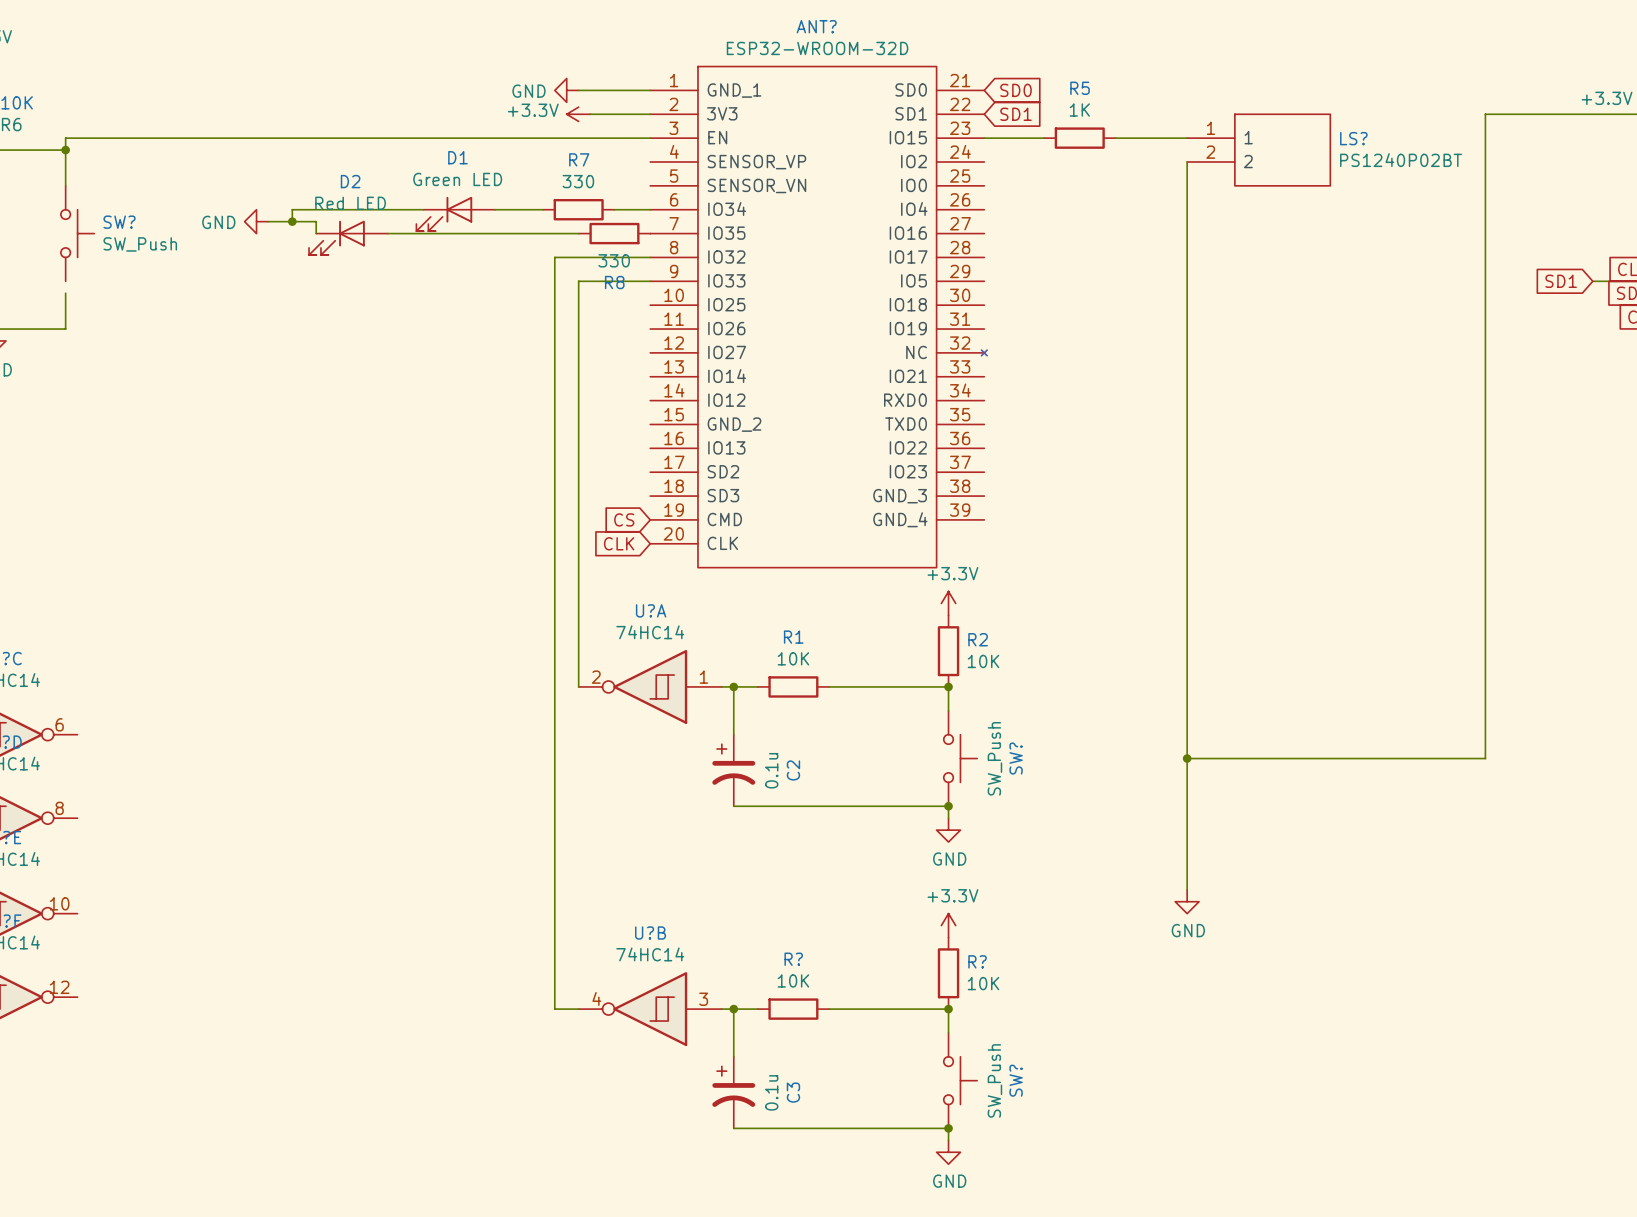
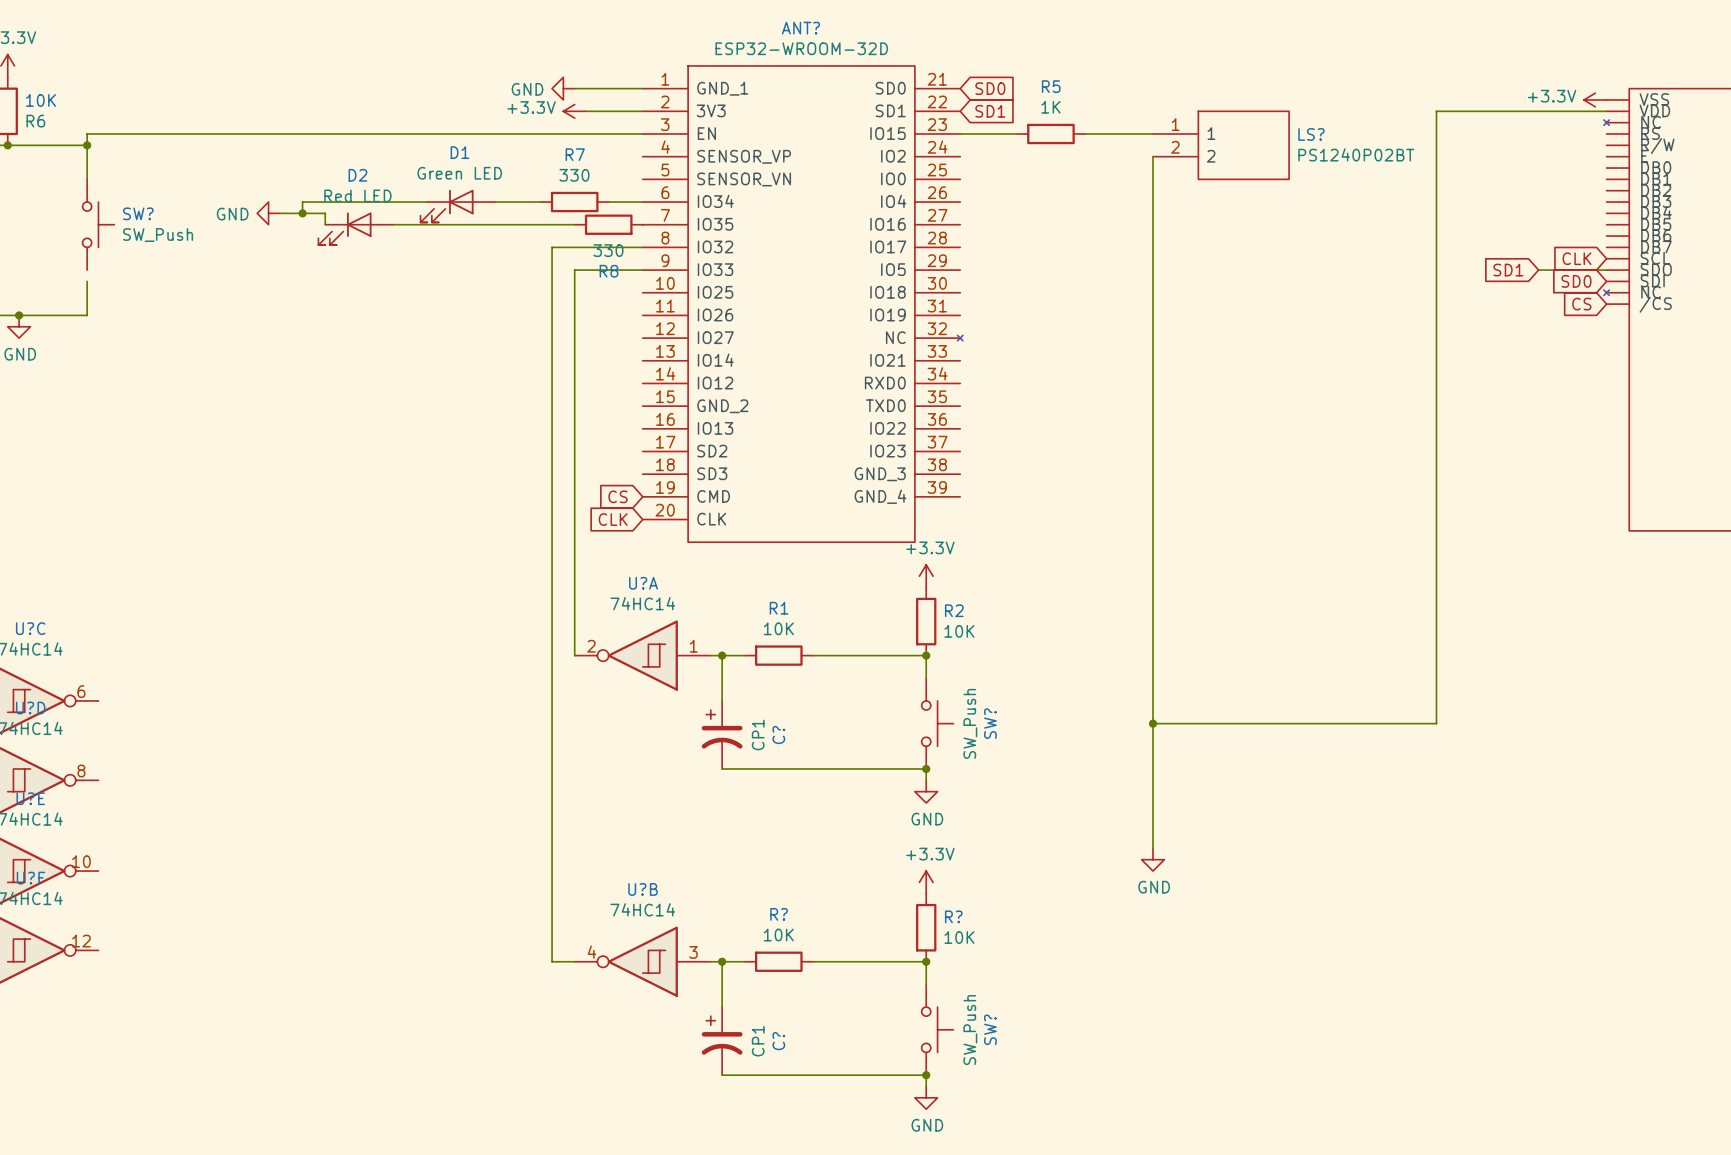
C2 value: 0.1u (771, 770) -> CP1 (758, 734)
C2 name: C2 (793, 770) -> C? (778, 734)
C3 value: 0.1u (771, 1092) -> CP1 (758, 1041)
C3 name: C3 (793, 1092) -> C? (778, 1041)

